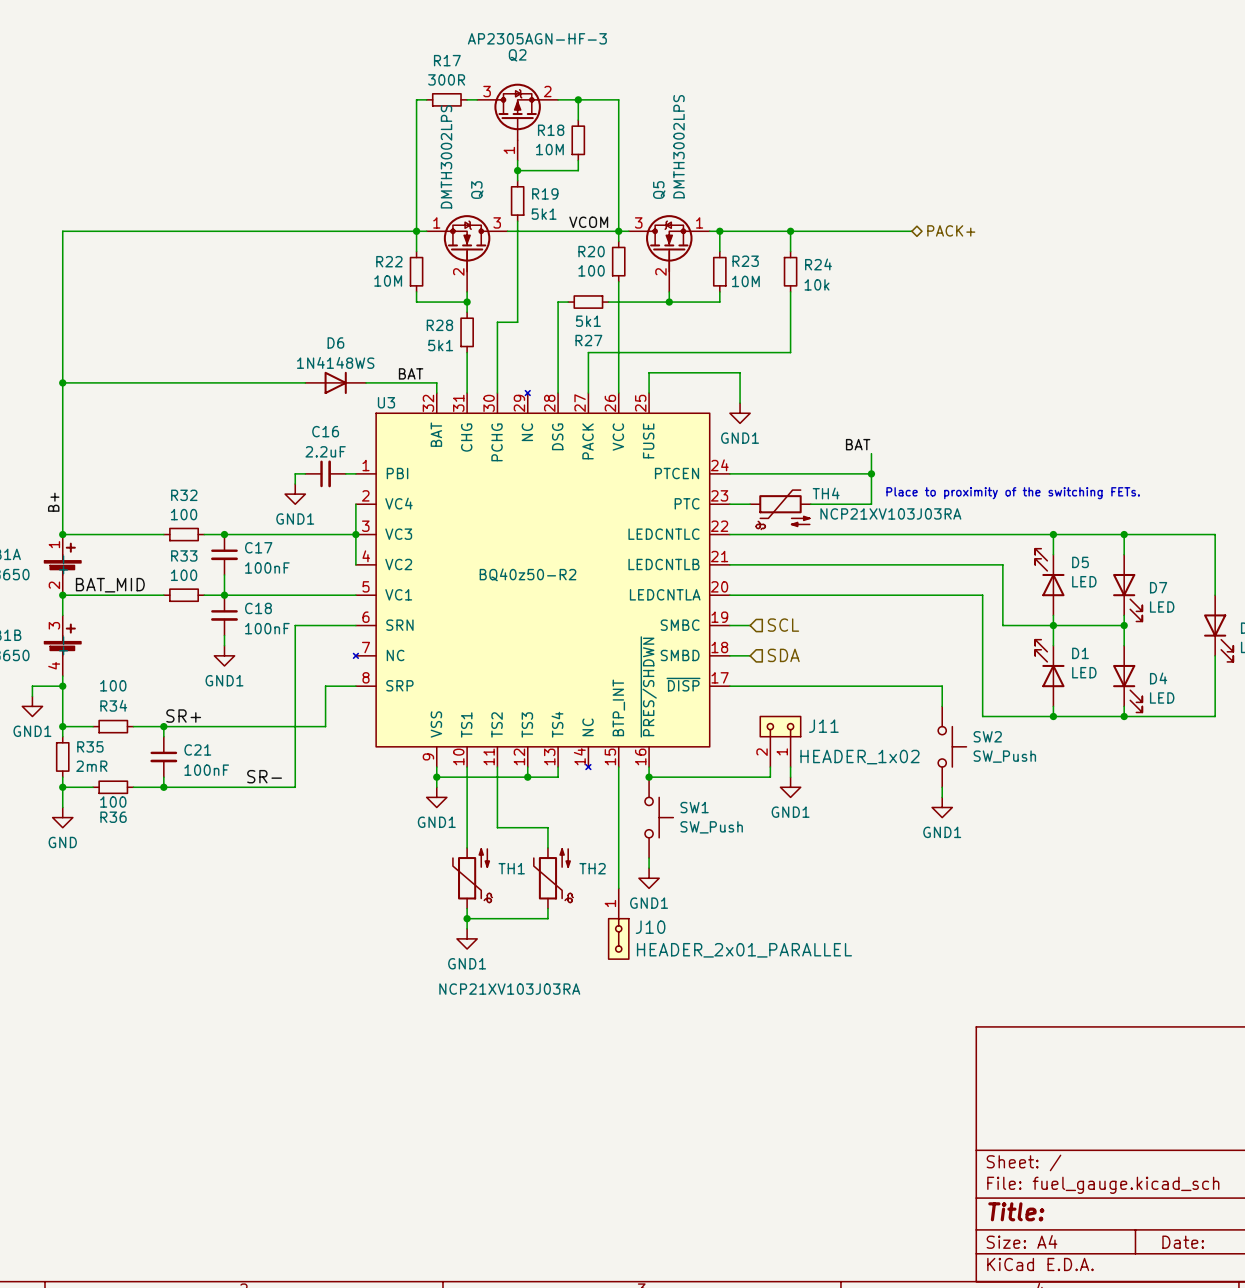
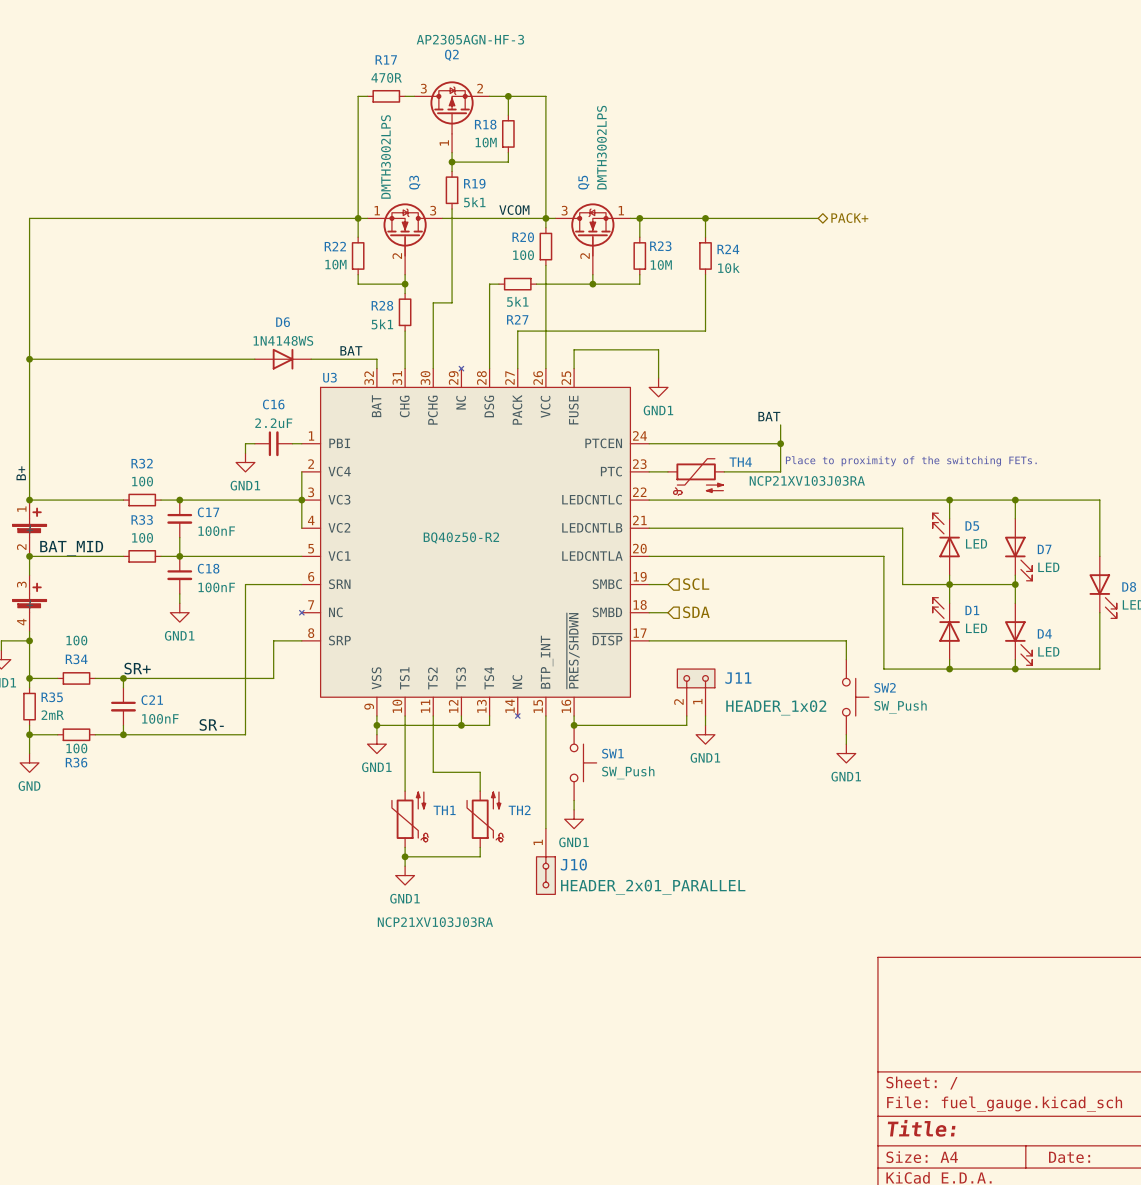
R17 value: 300R (446, 79) -> 470R (386, 77)

